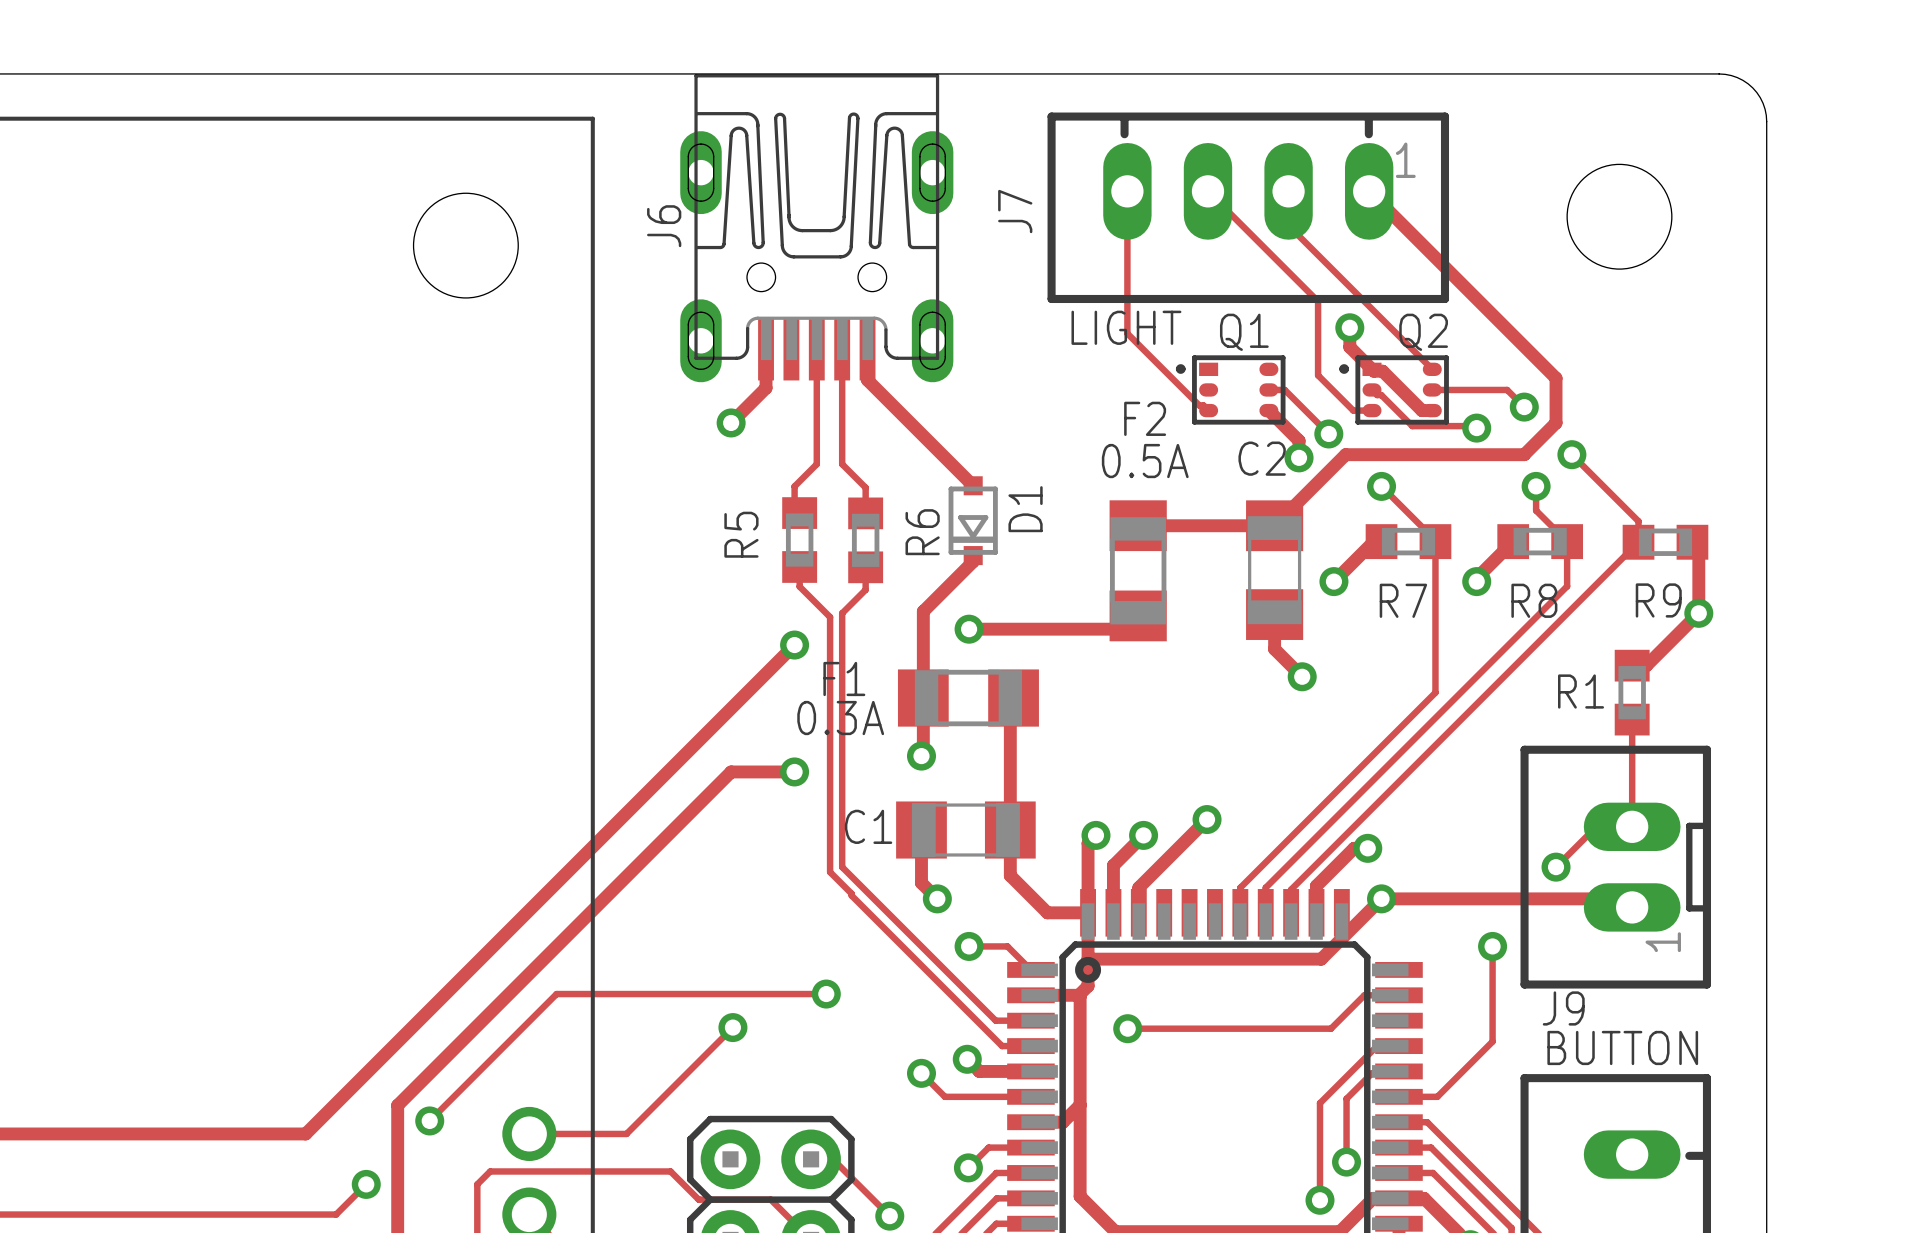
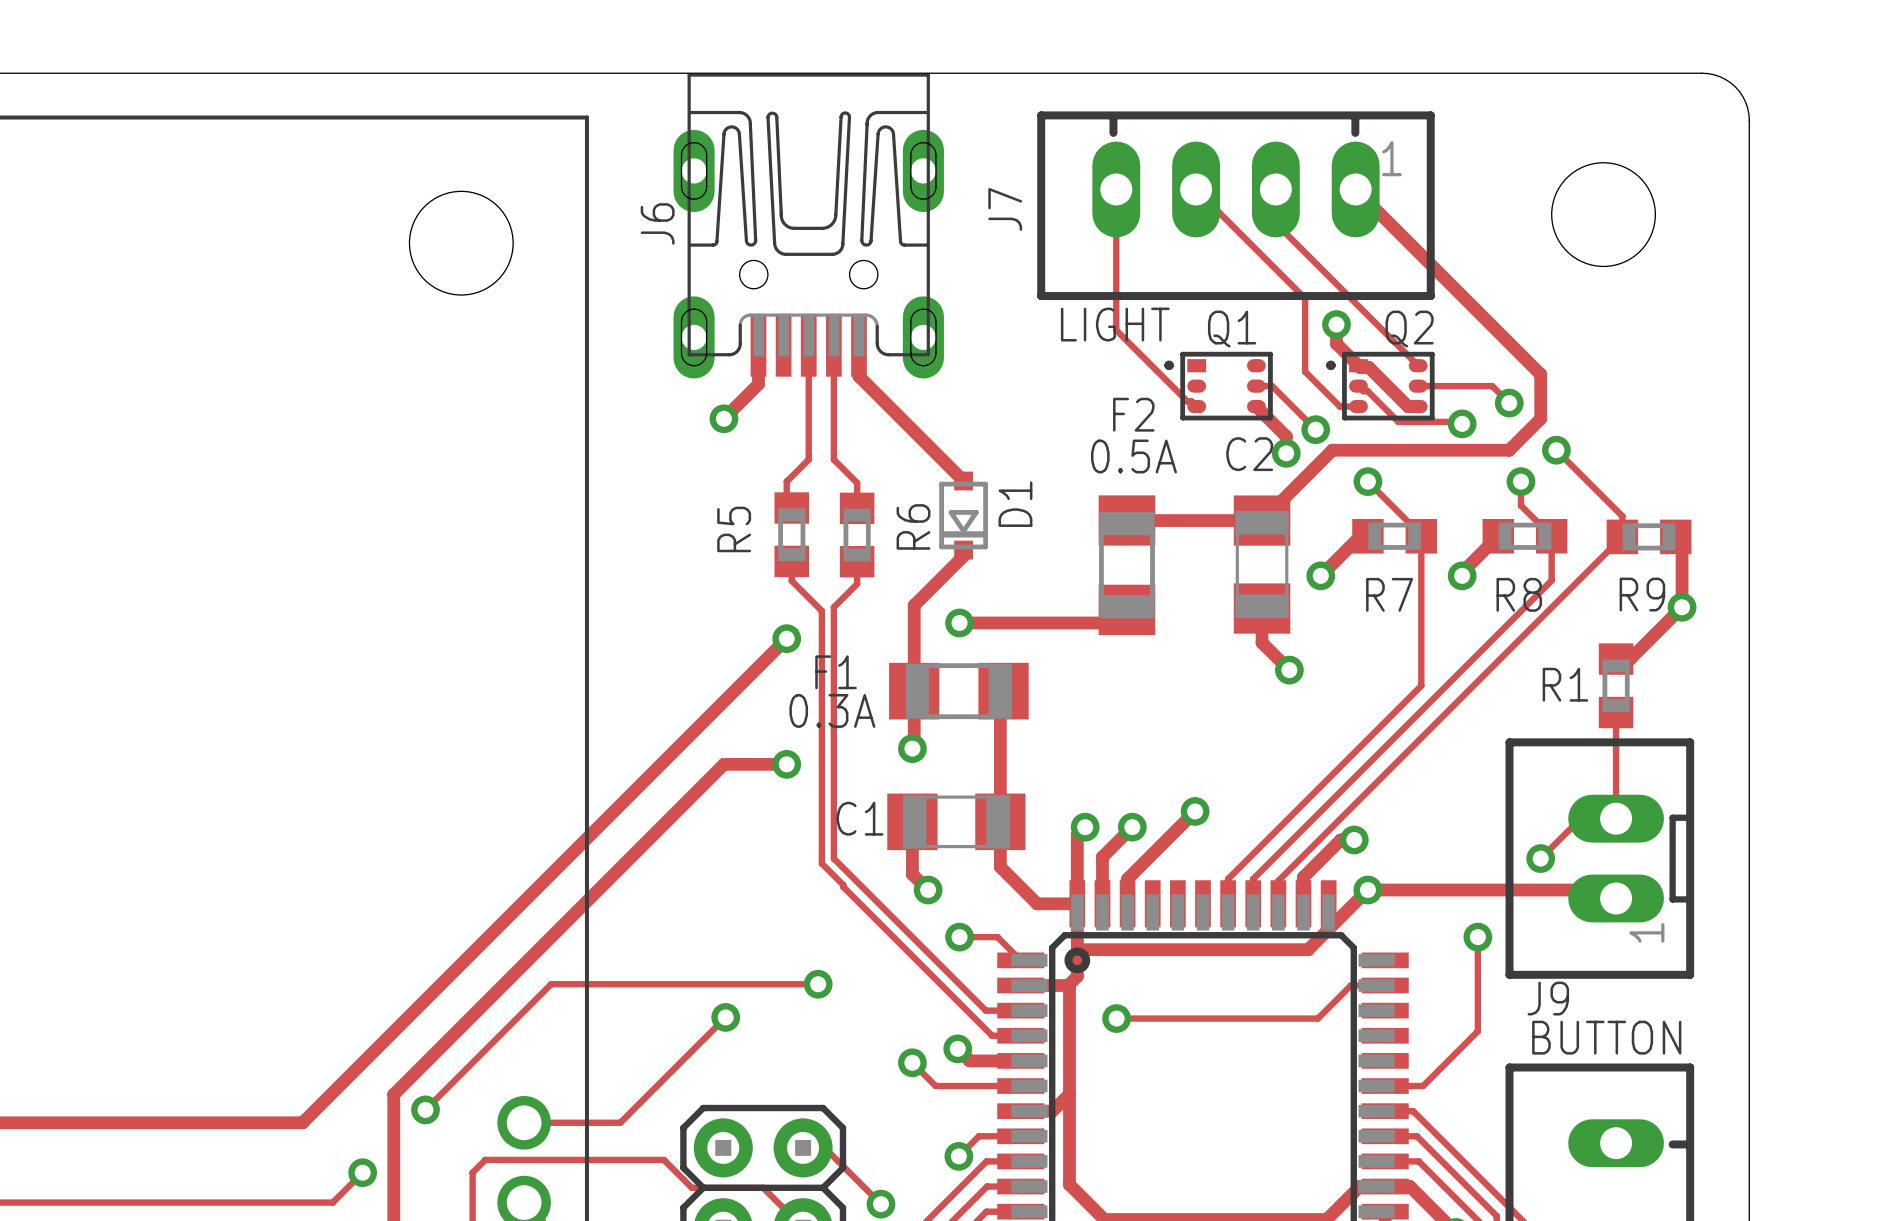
track: (1398, 1046) (1377, 1046) (1319, 1103) (1319, 1200) -> none
track: (1398, 1071) (1397, 1073) (1372, 1073) (1346, 1098) (1346, 1162) -> none
via: (1346, 1162) -> none
via: (1319, 1200) -> none

